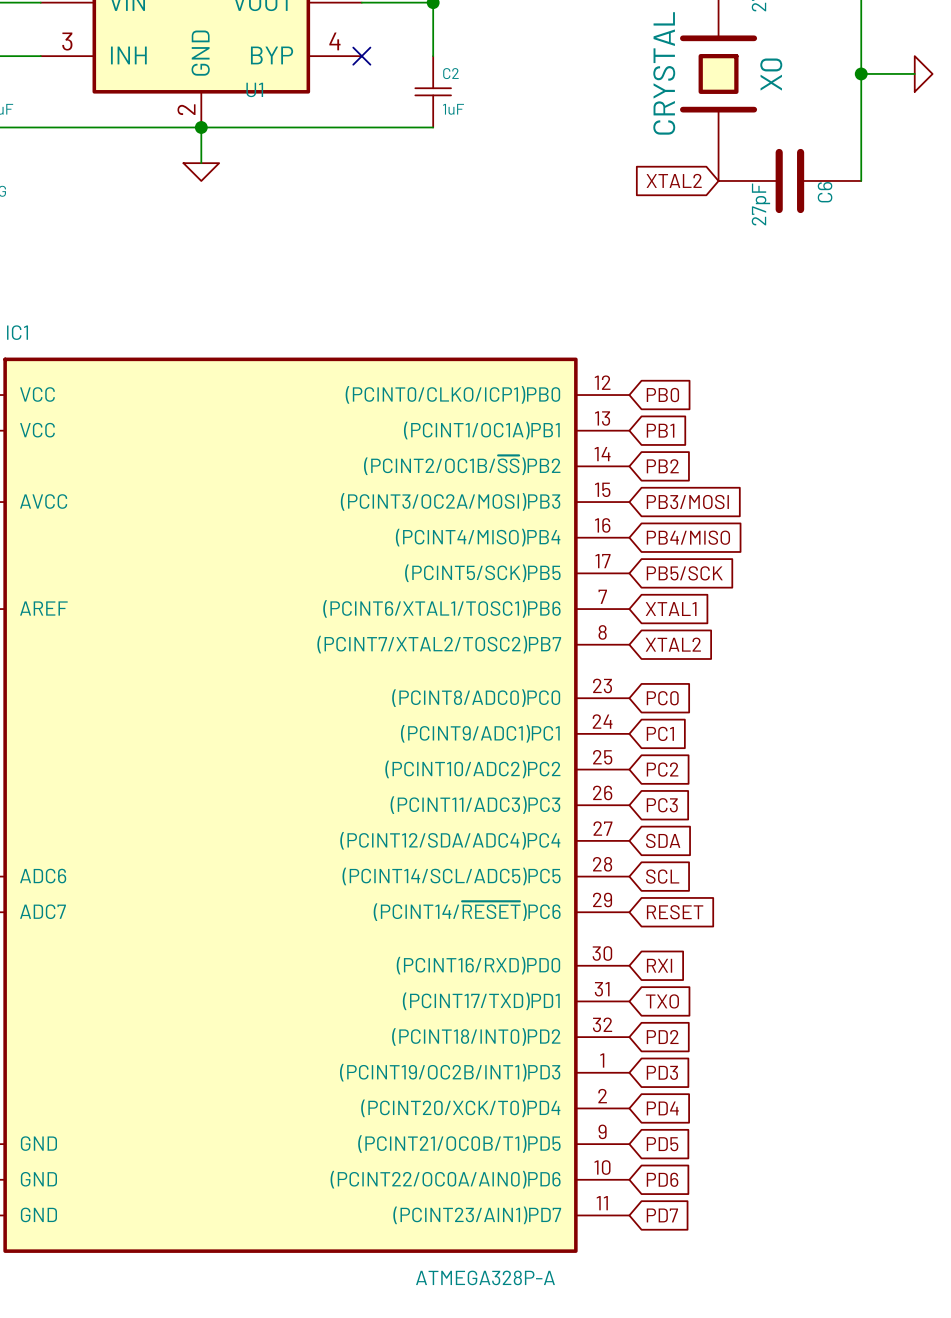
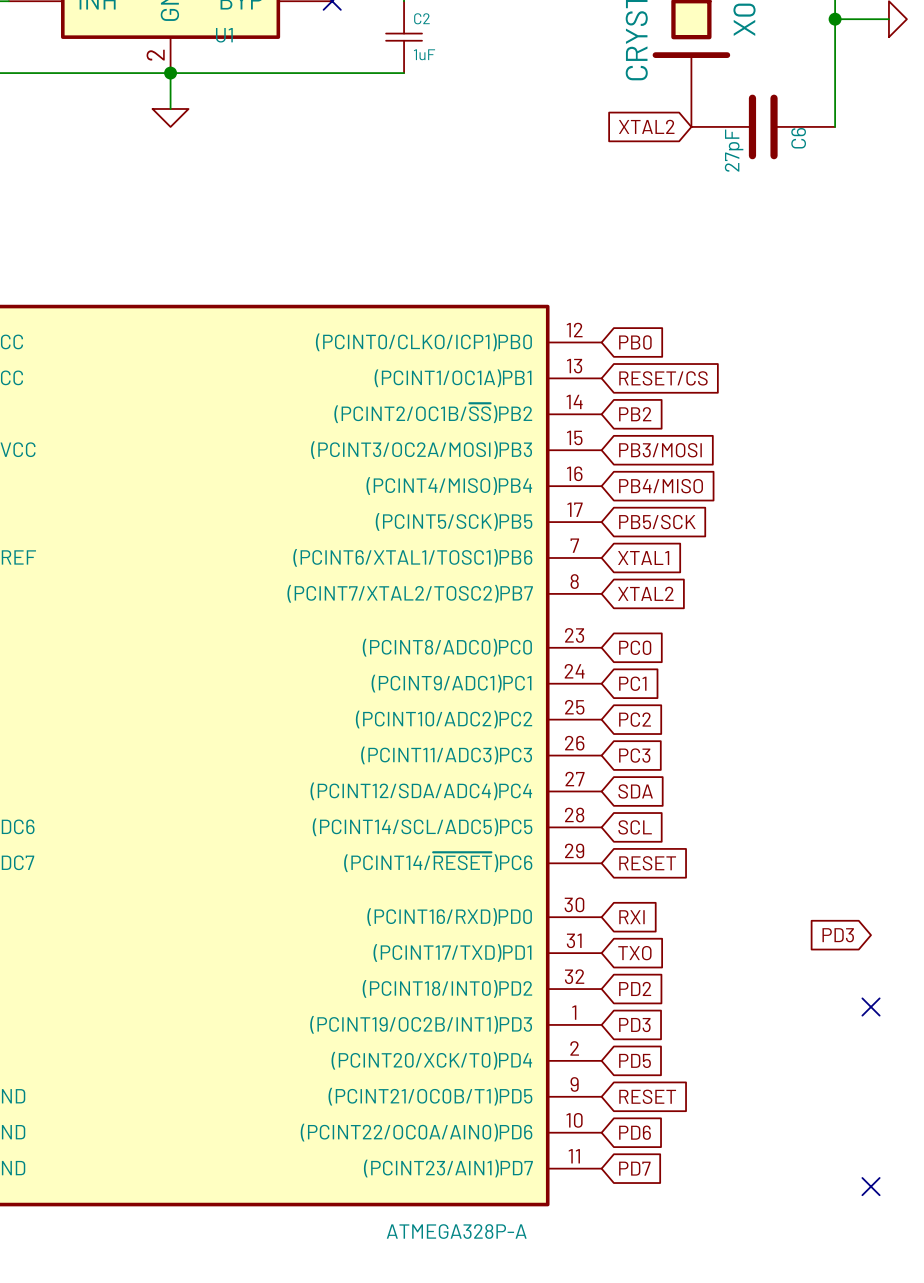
global label: PB1 (660, 430) -> RESET/CS (663, 378)
global label: none -> PD3 (838, 935)
no-connect mark: none -> (871, 1006)
global label: PD4 (662, 1108) -> PD5 (634, 1060)
global label: PD5 (662, 1144) -> RESET (647, 1096)
no-connect mark: none -> (871, 1186)

